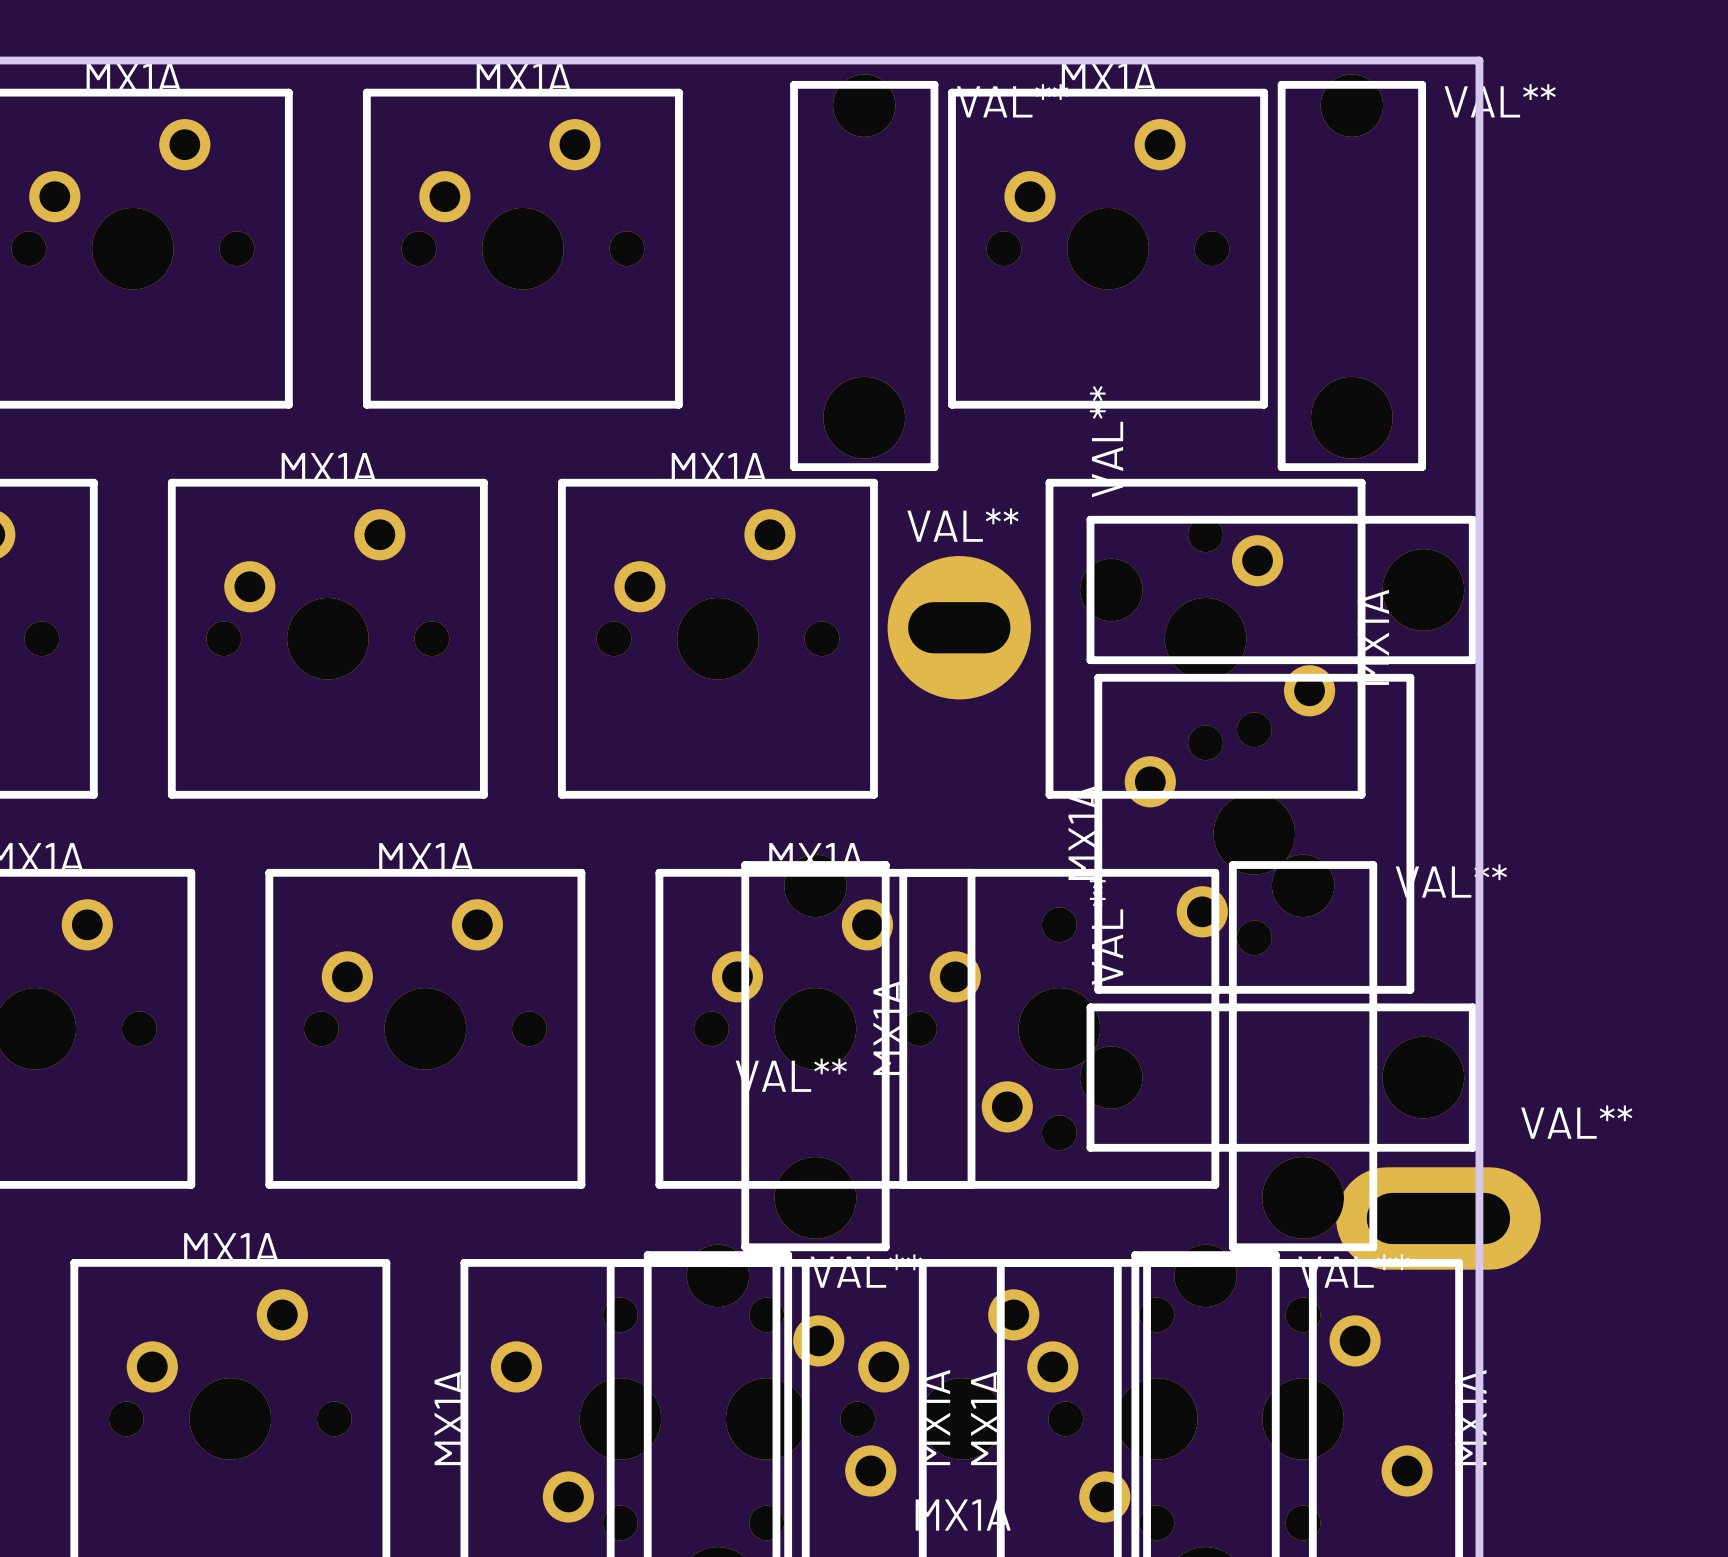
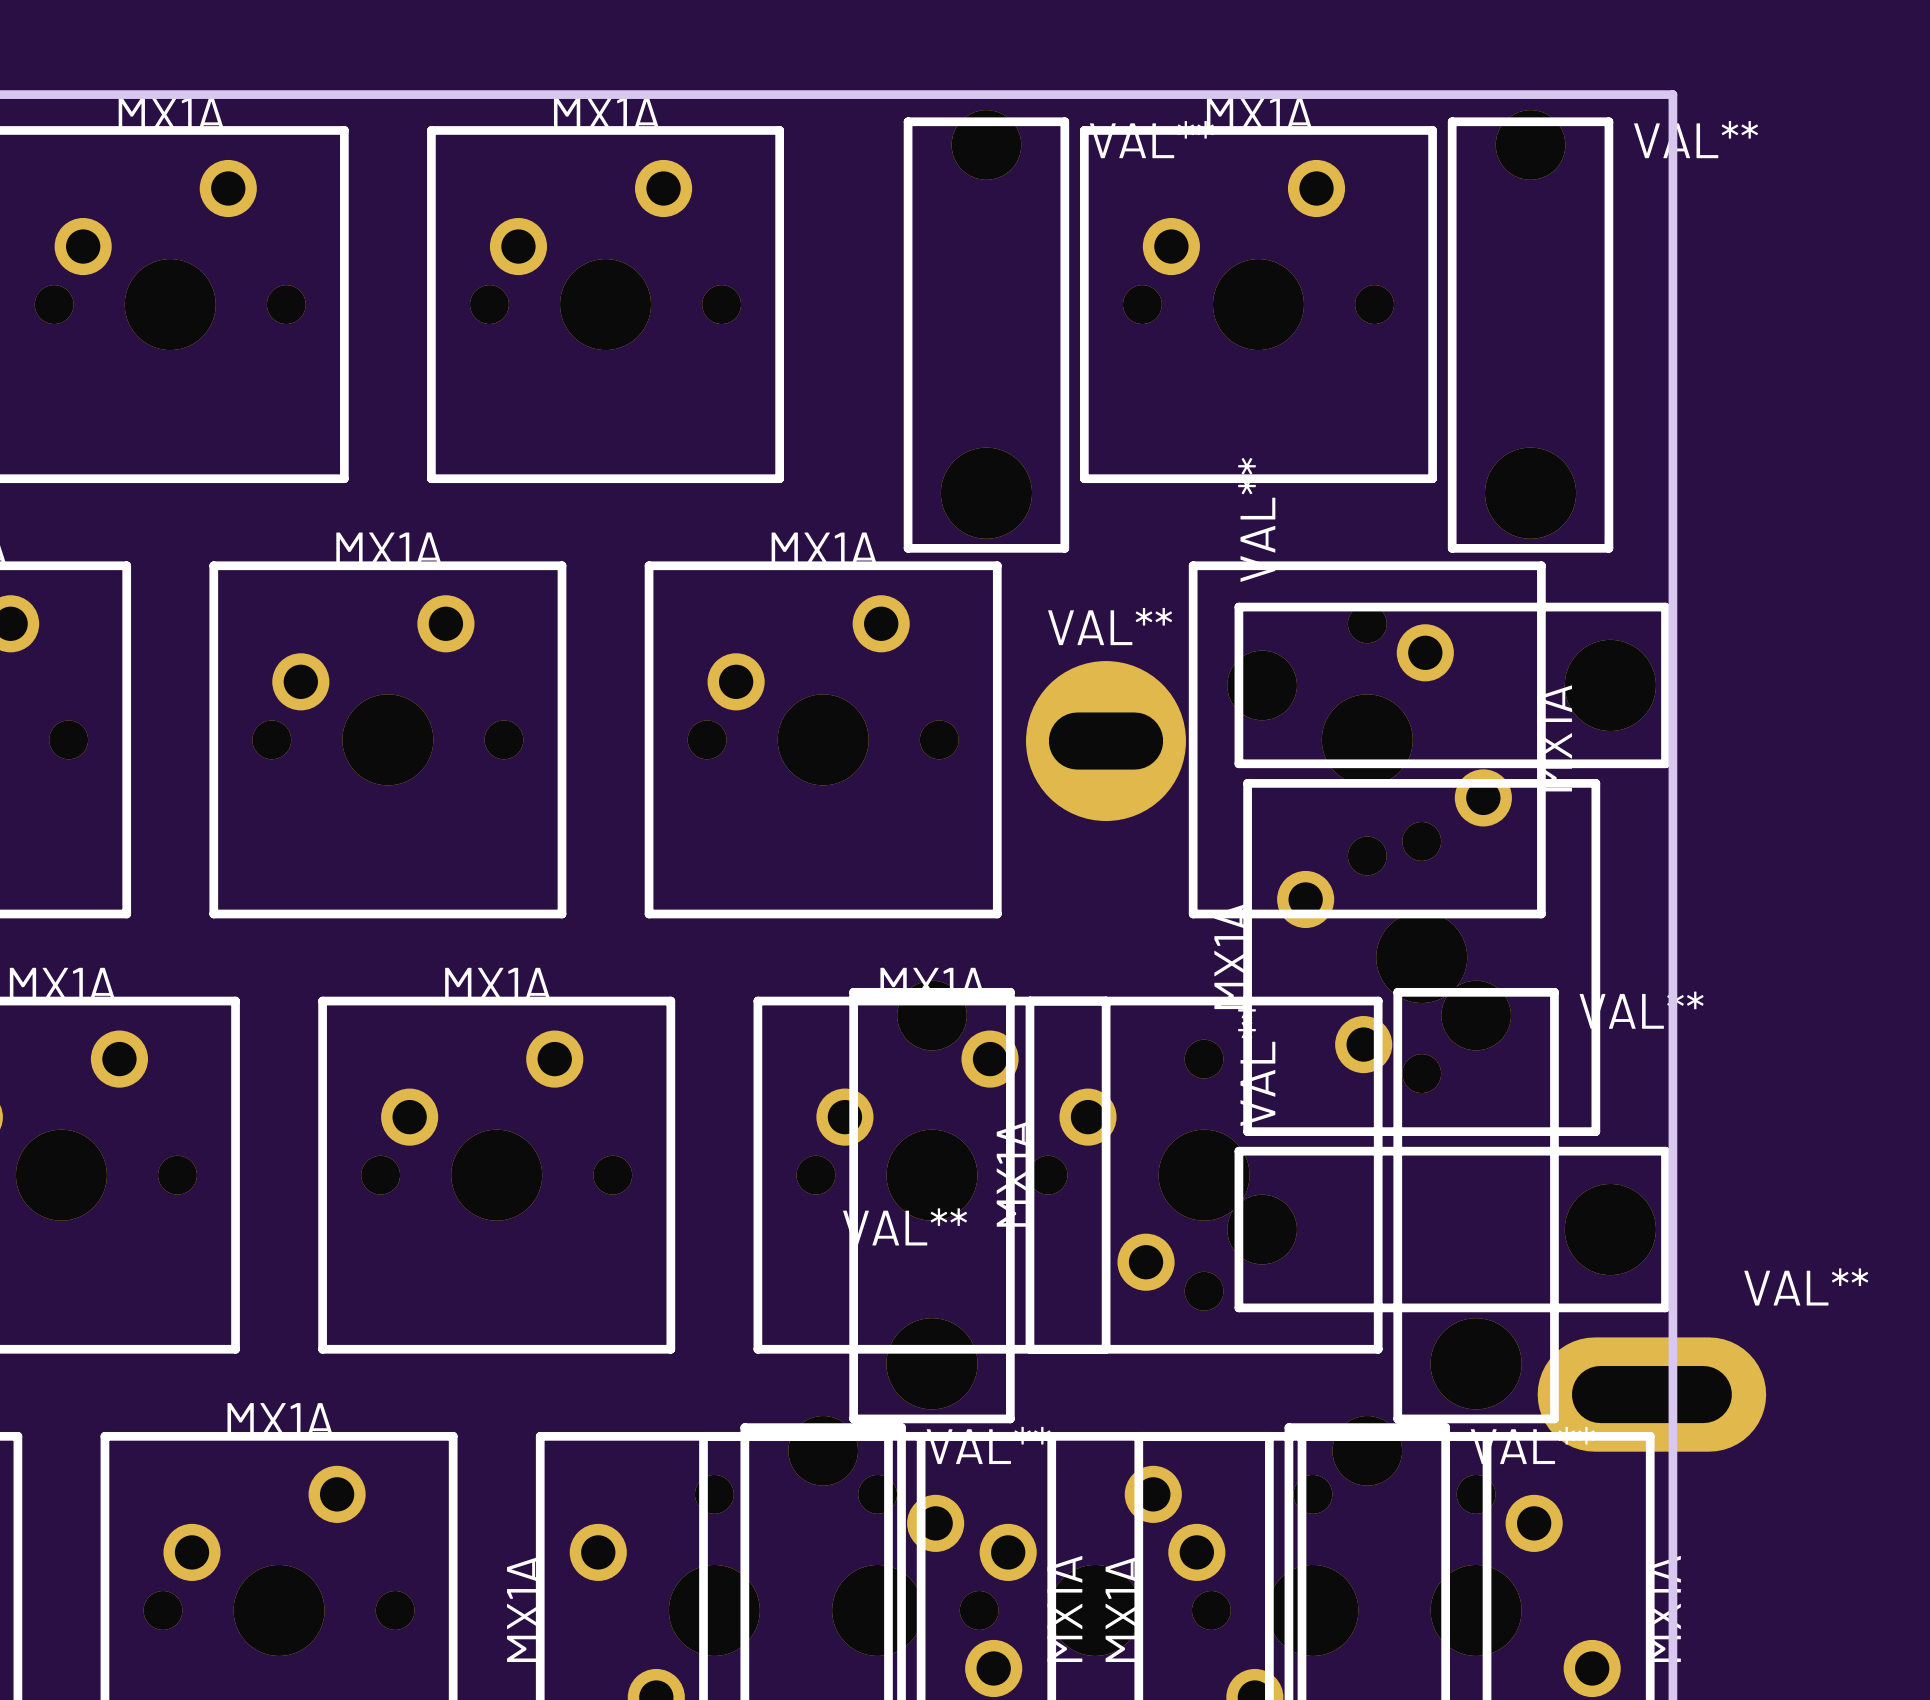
part position: (959, 627) -> (1106, 741)
part position: (1438, 1218) -> (1651, 1394)

